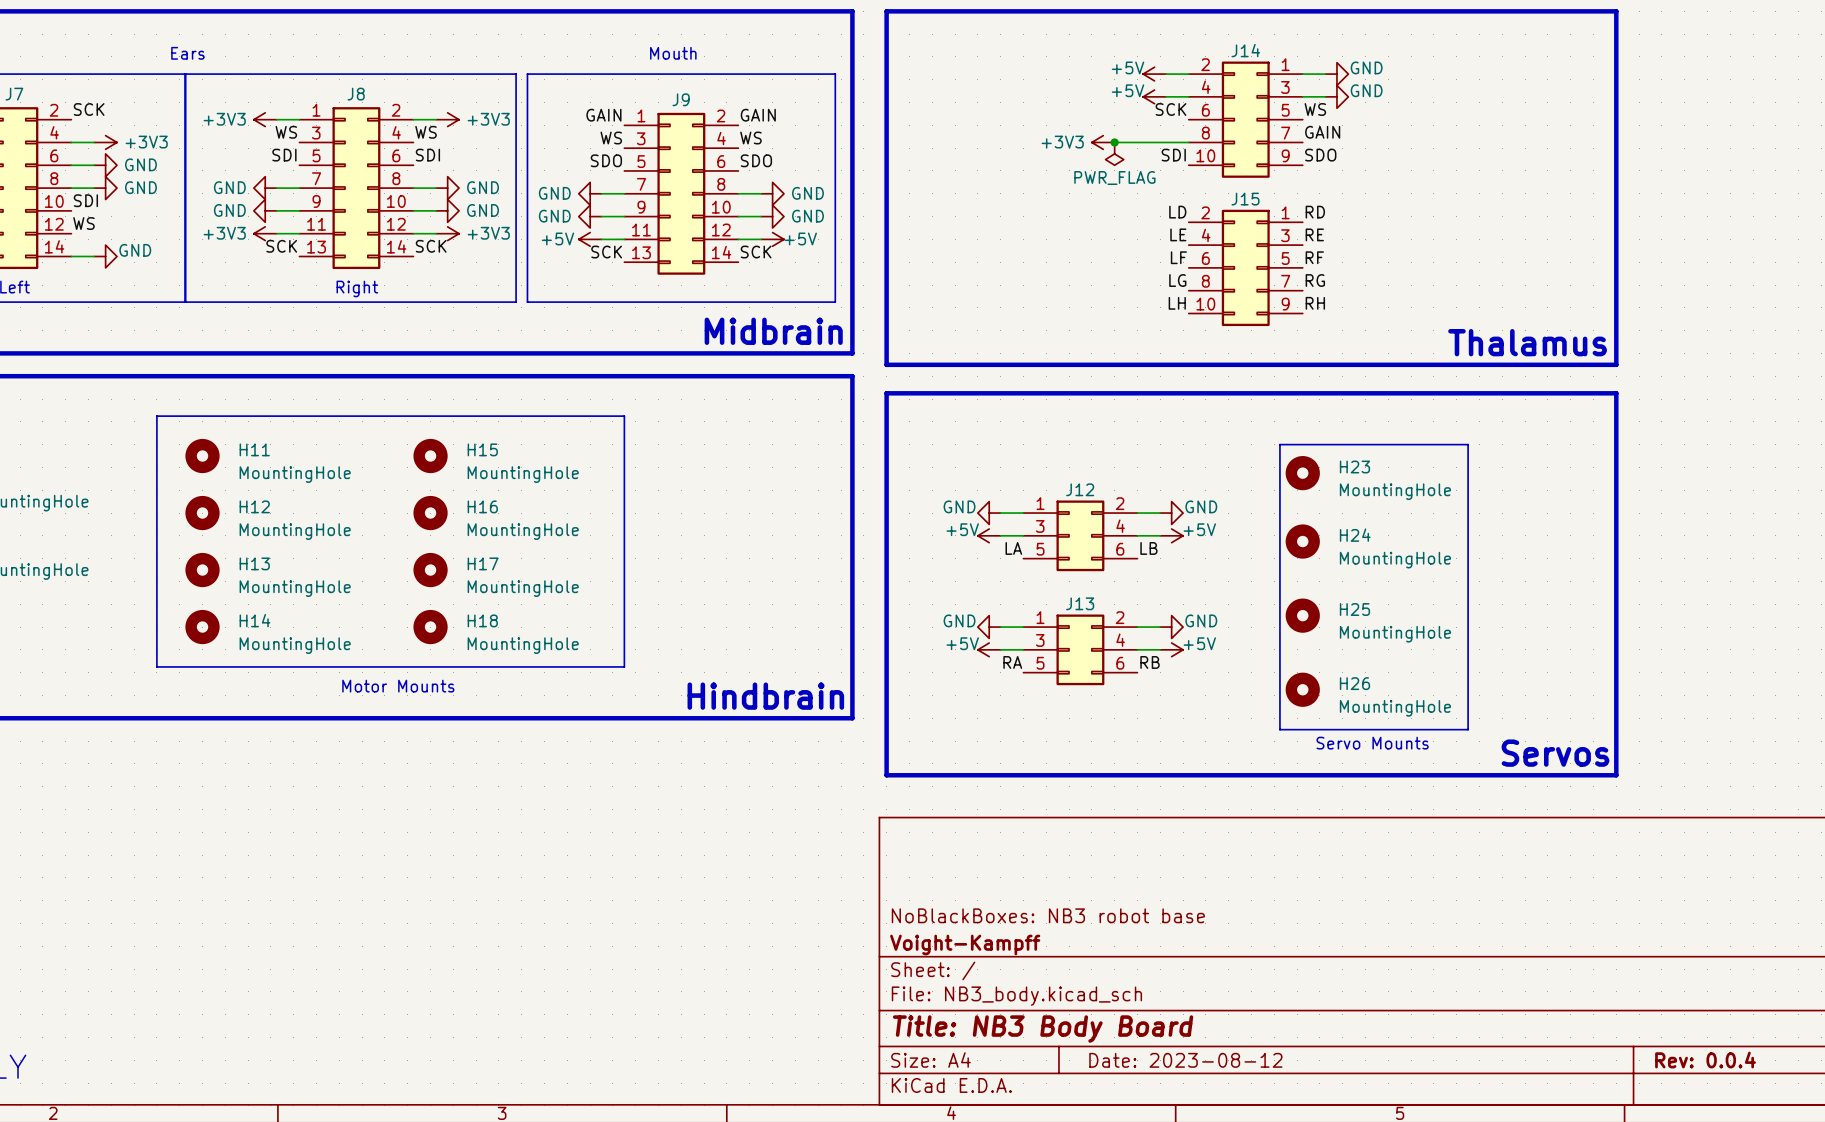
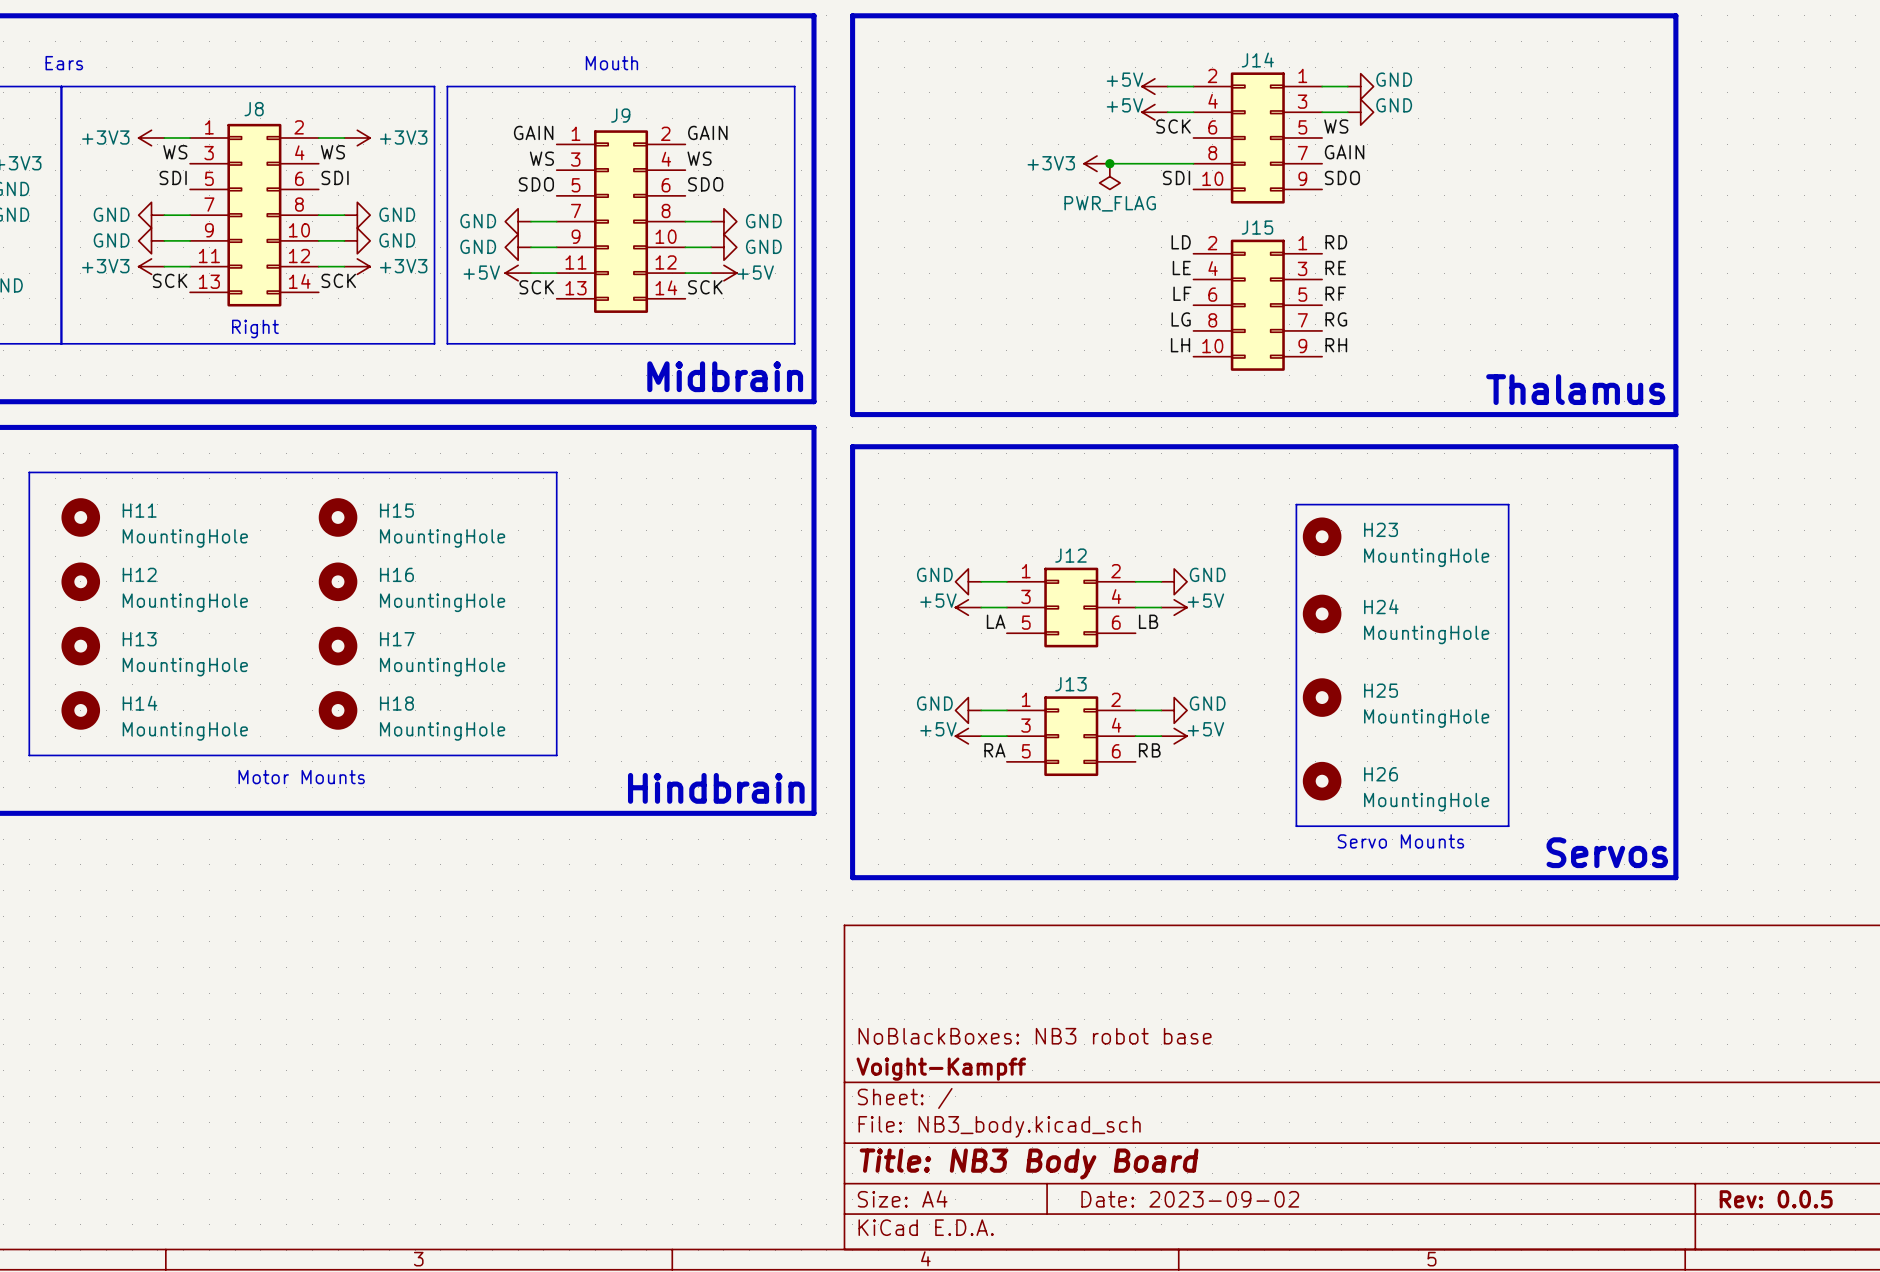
title block: Date: 2023-08-12 (1185, 1060) -> Date: 2023-09-02 (1190, 1199)
title block: Rev: 0.0.4 (1705, 1060) -> Rev: 0.0.5 (1776, 1199)

